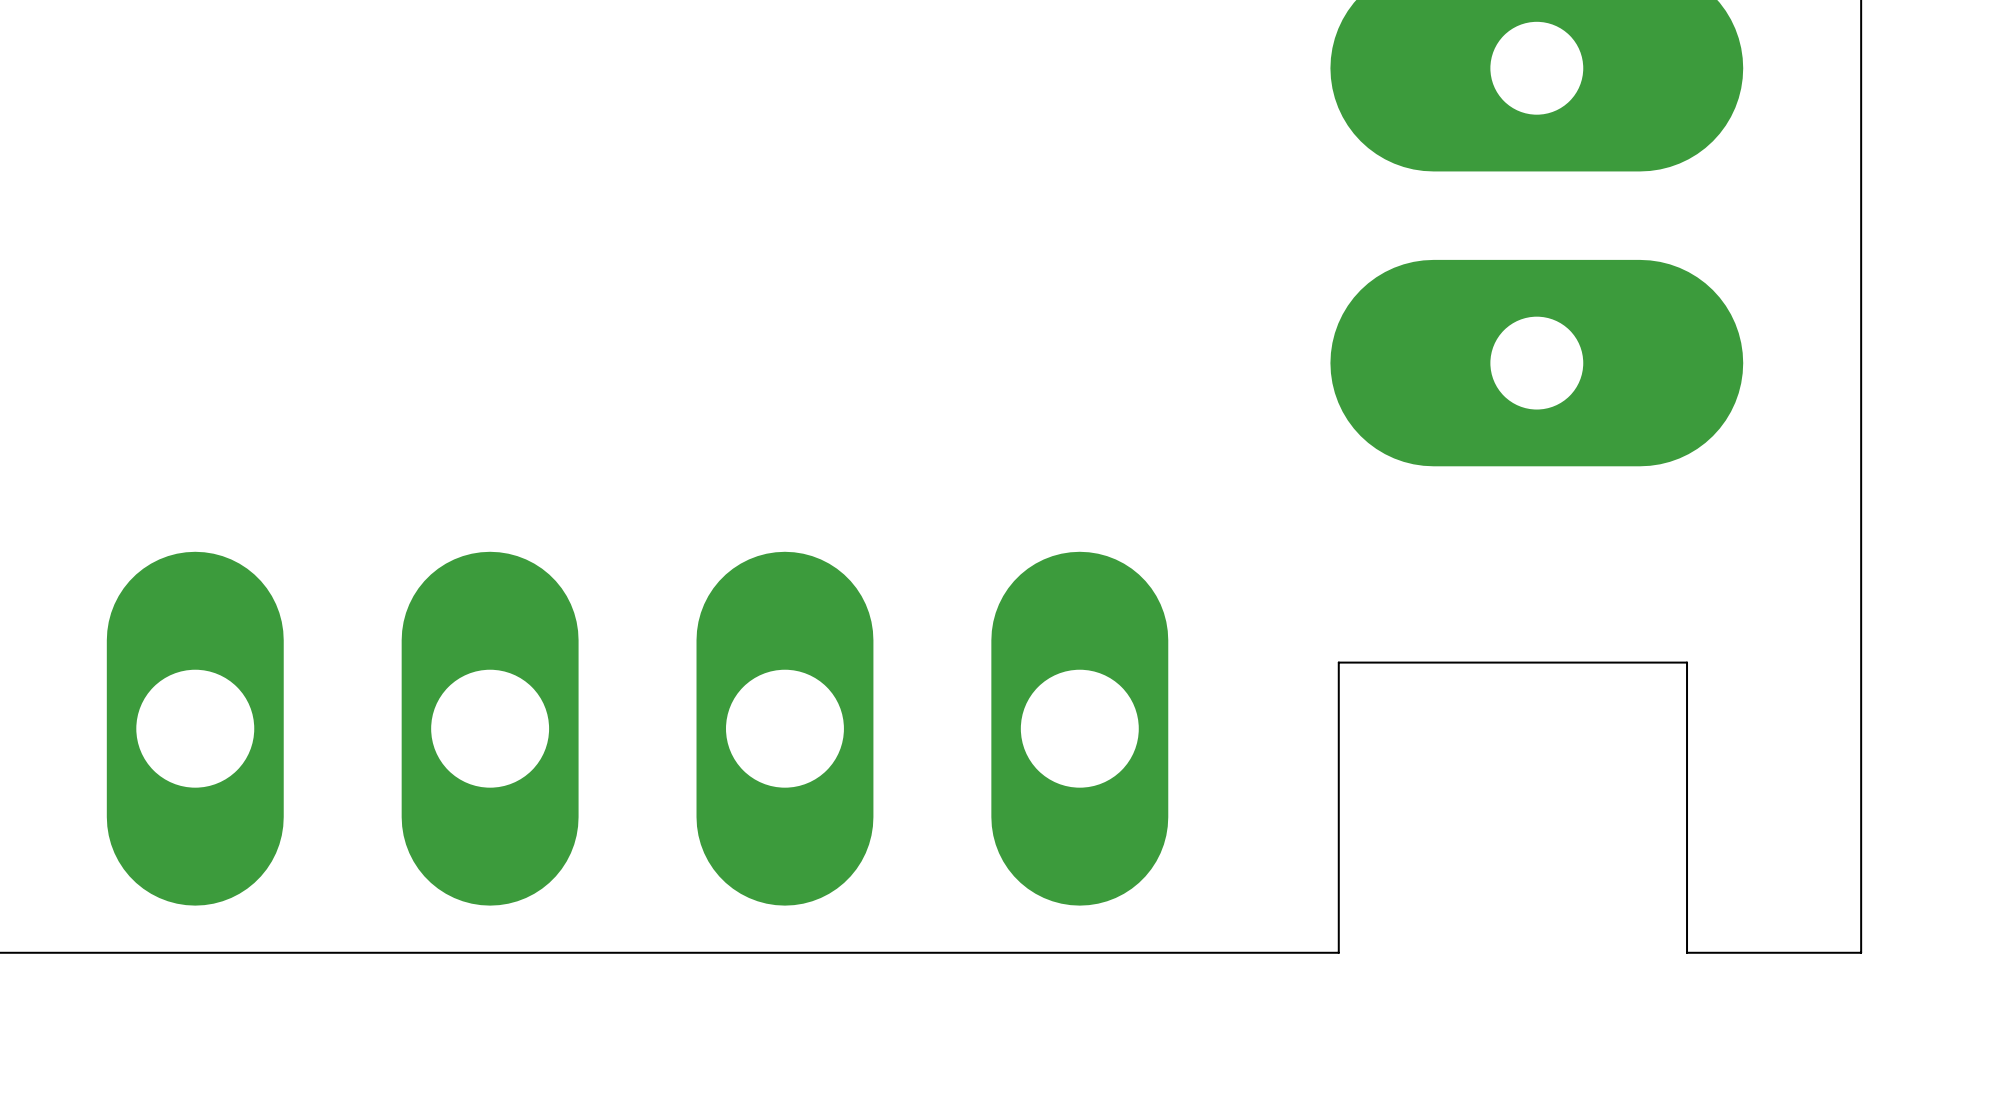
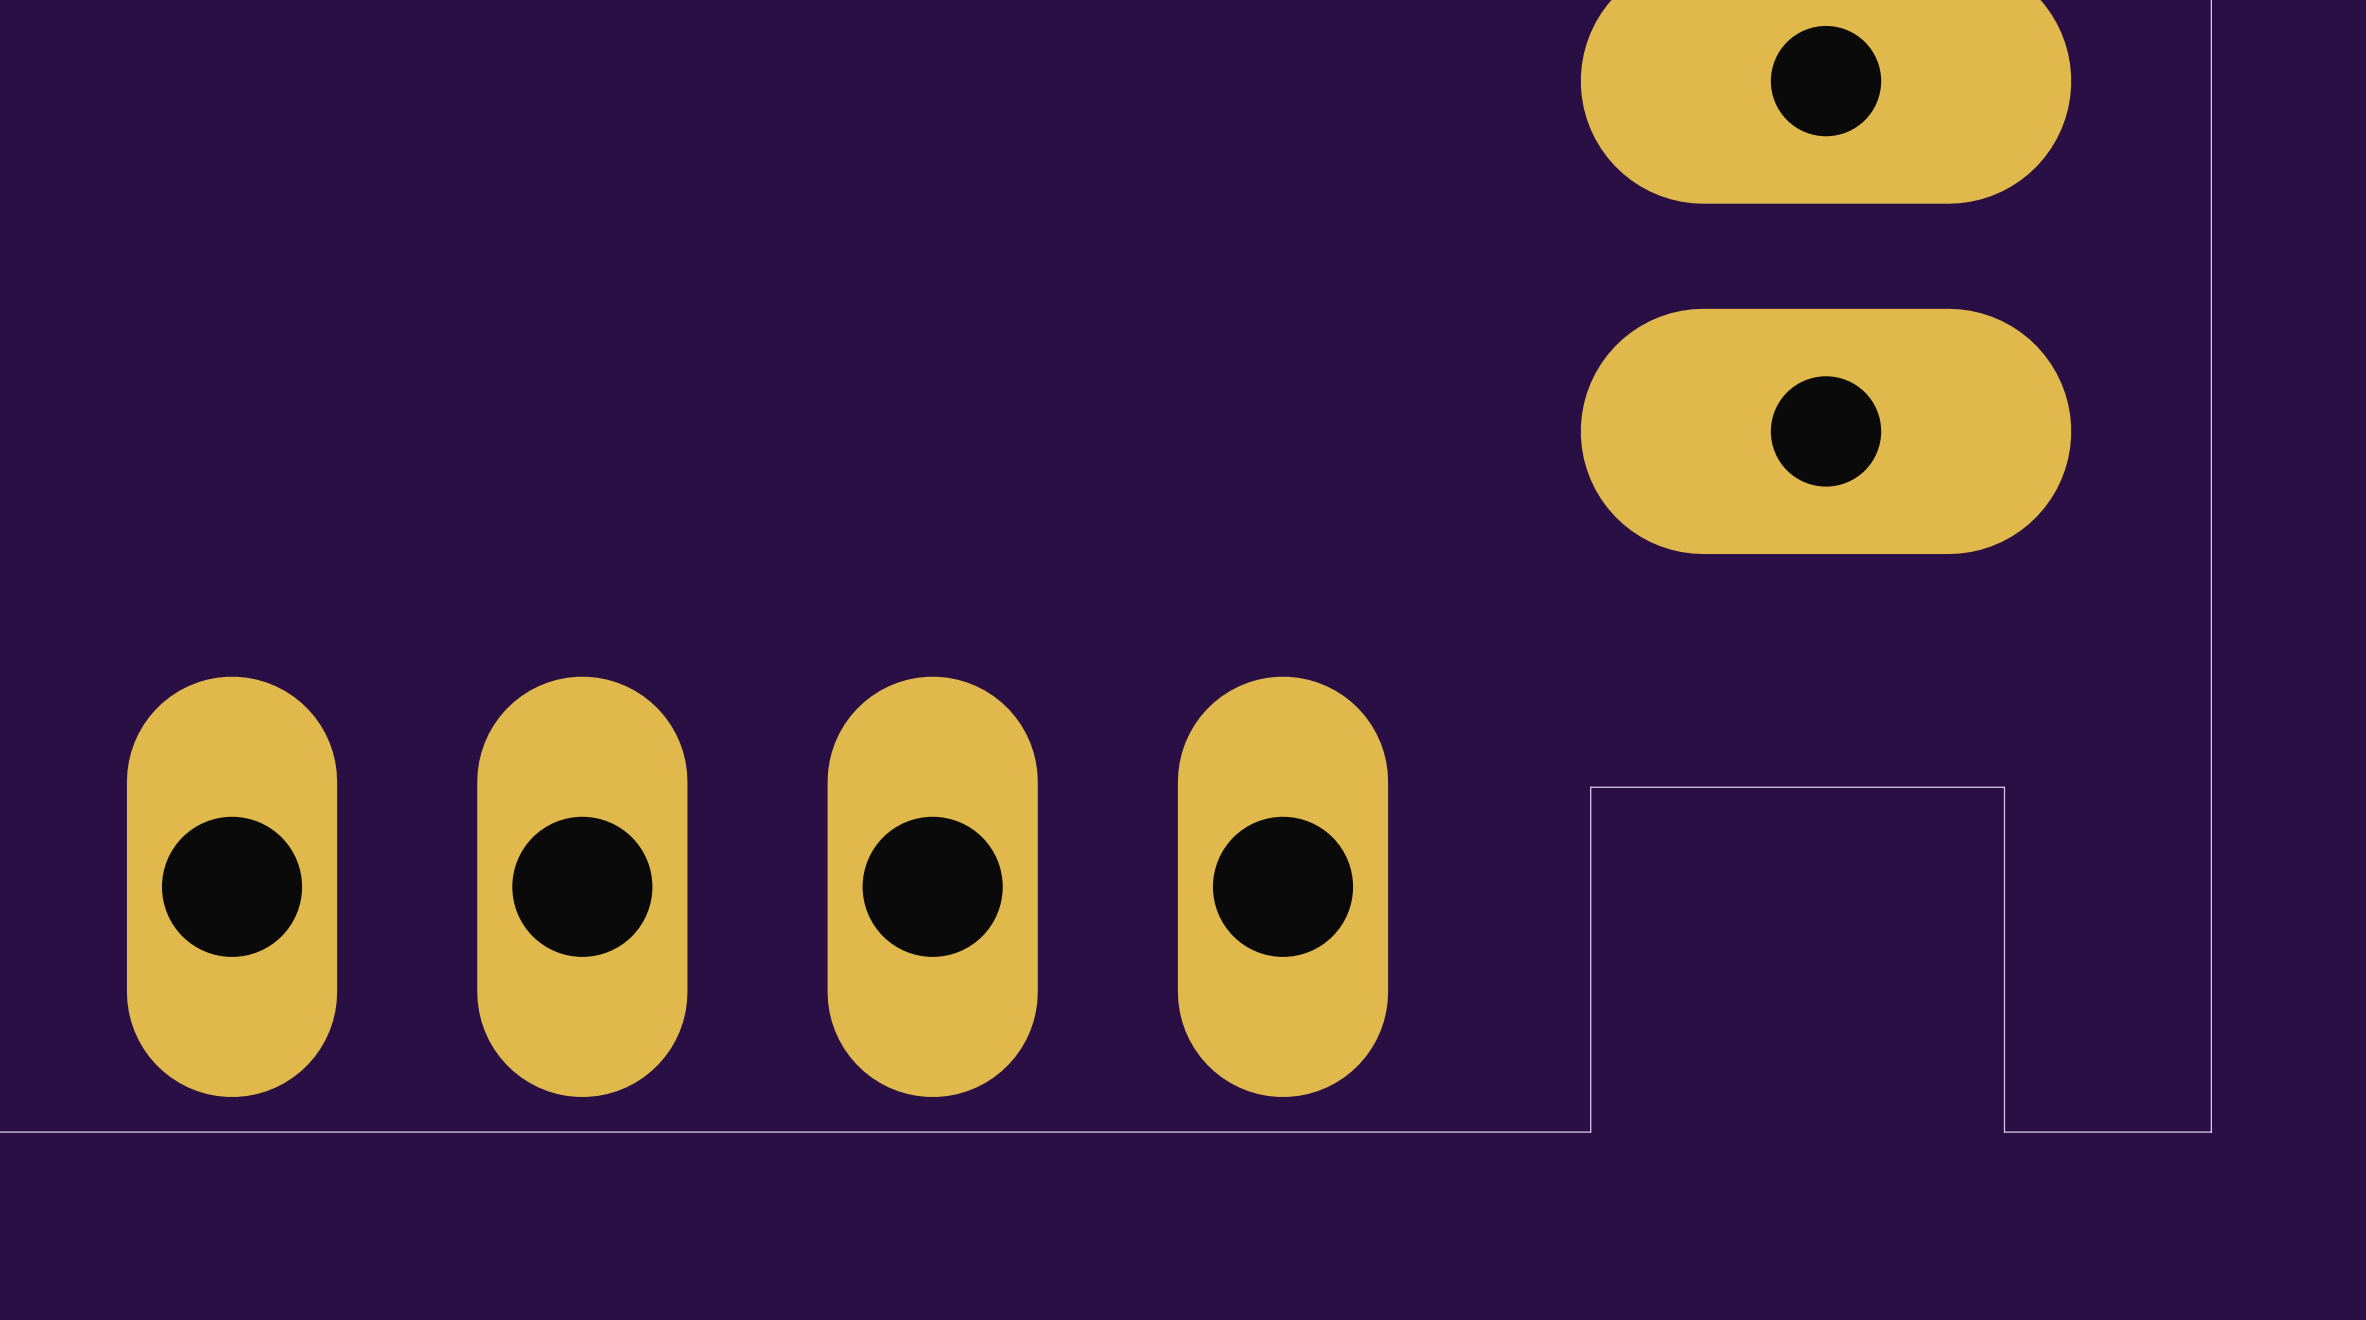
part position: (637, 728) -> (757, 886)

